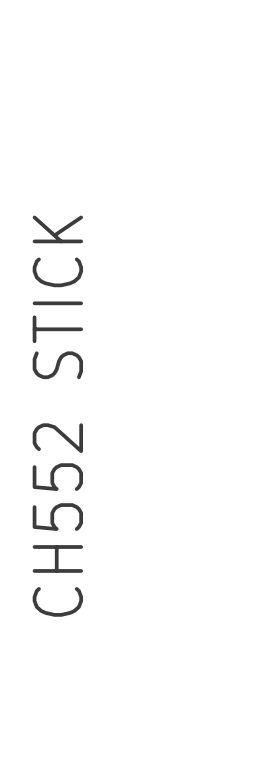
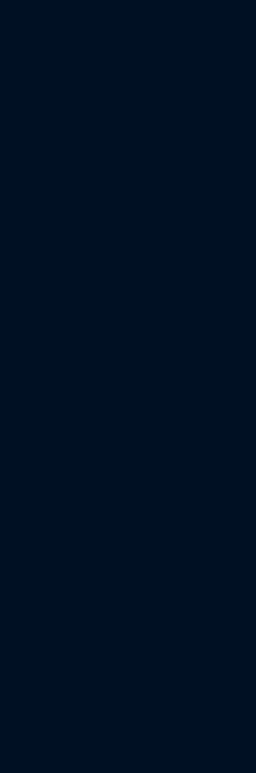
text: CH552 STICK (57, 416) -> none

